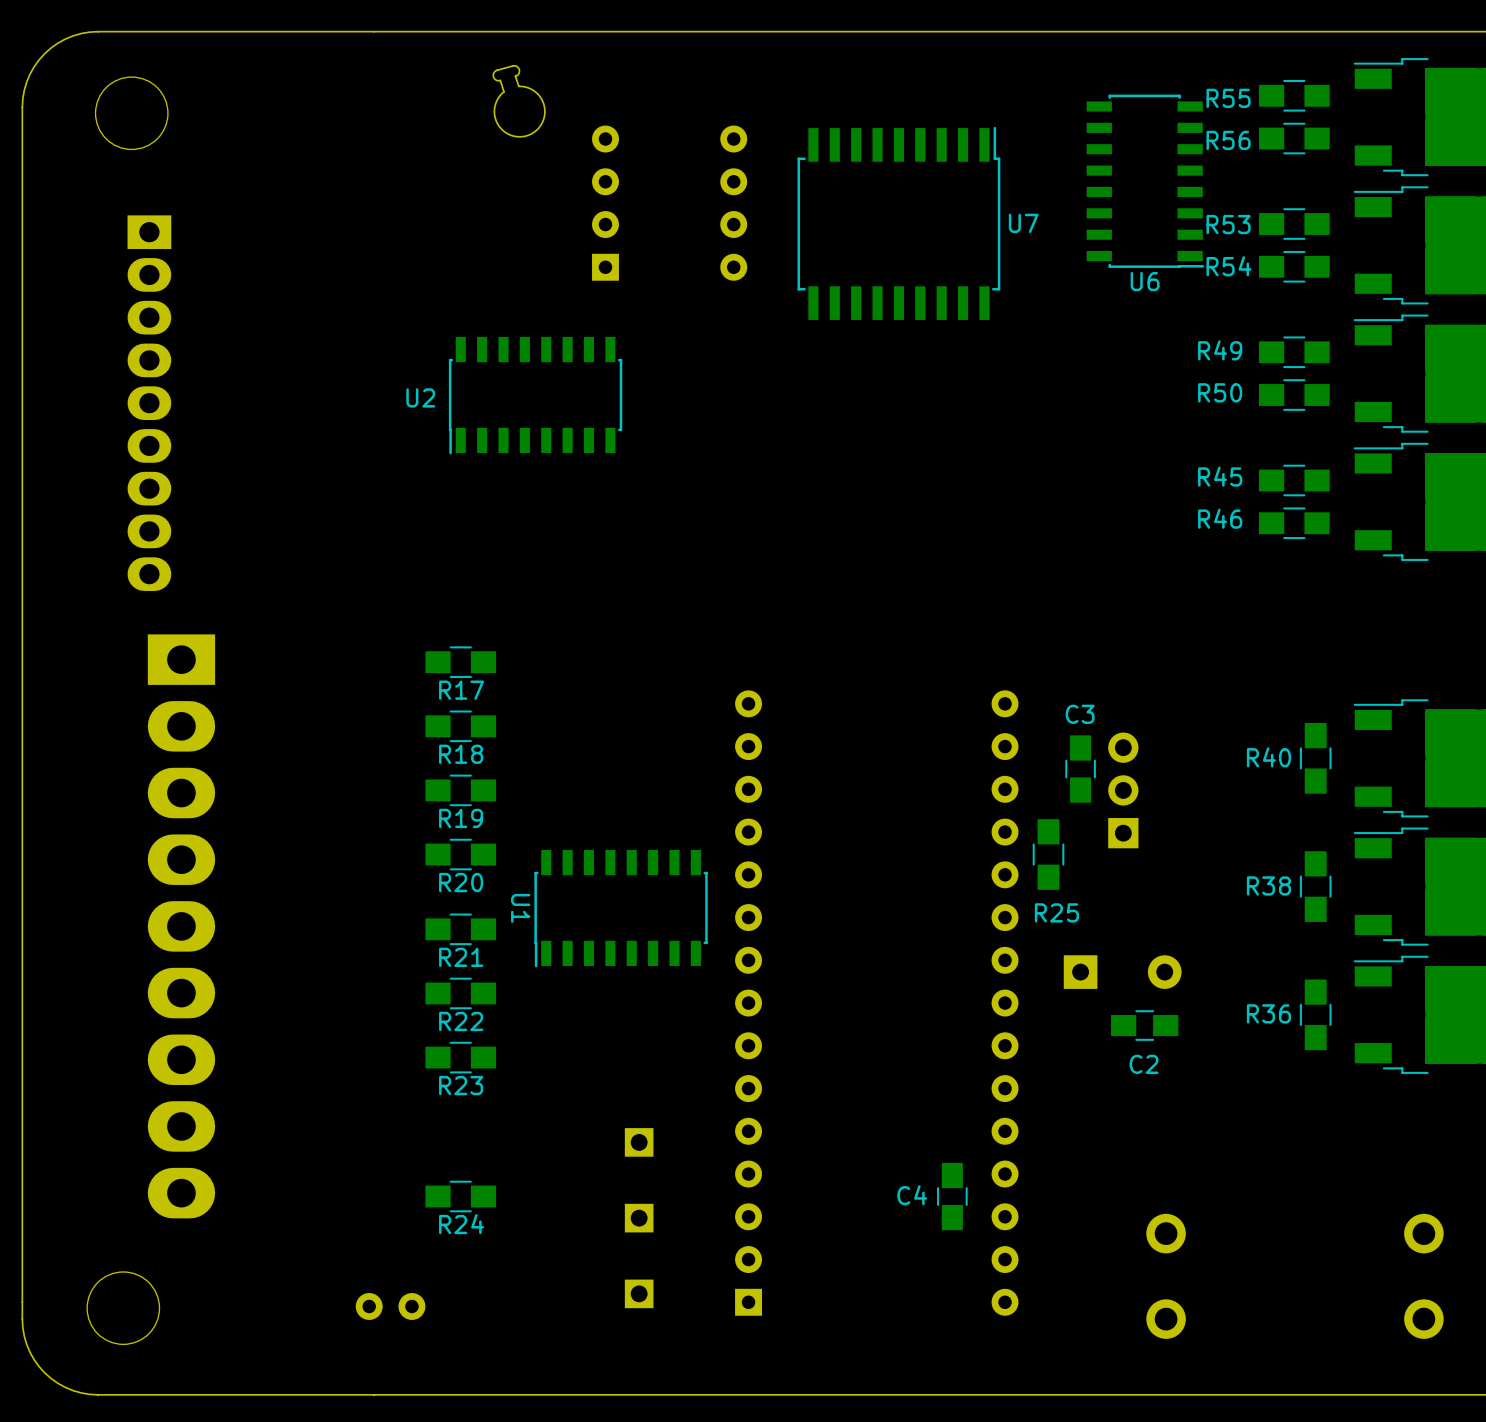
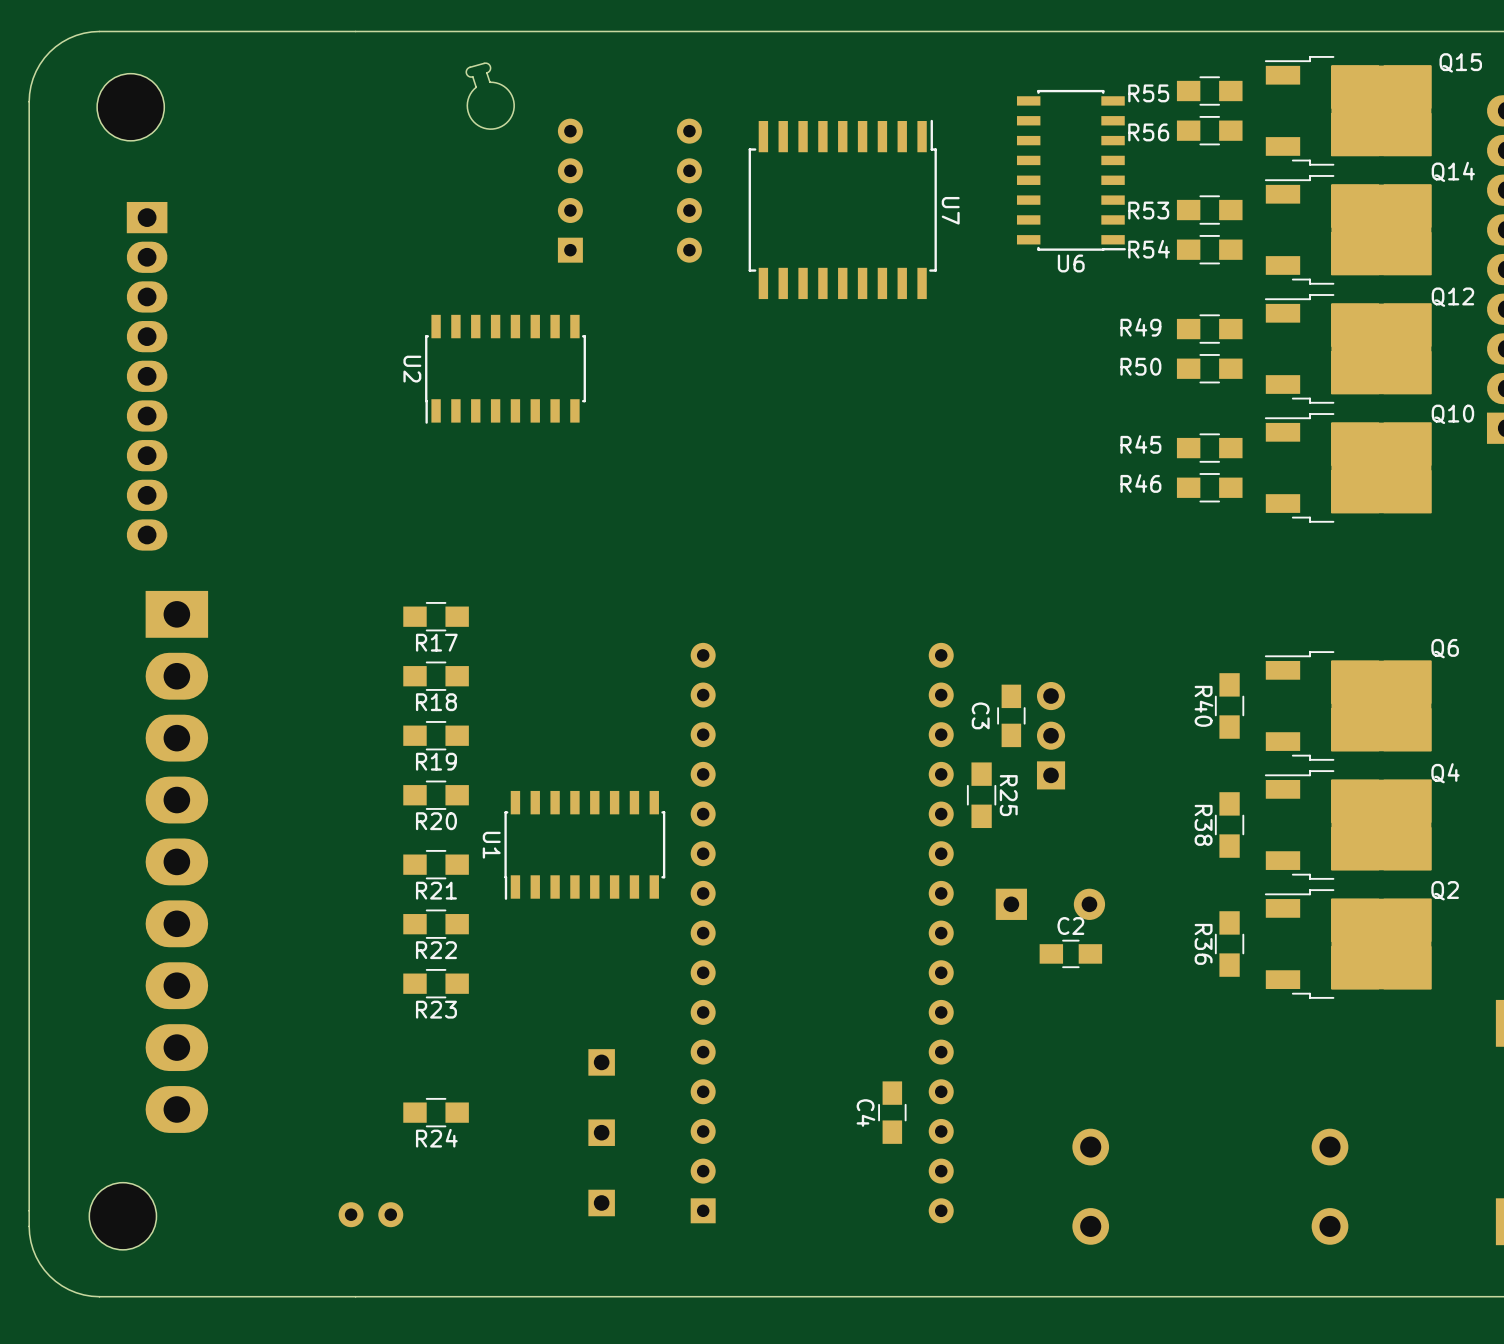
U7 name rotation: 0° (1023, 223) -> 90° clockwise (950, 210)
U2 name rotation: 0° (420, 397) -> 90° clockwise (412, 369)
C3 name rotation: 0° (1080, 714) -> 90° clockwise (980, 715)
C3 name position: C3 (1080, 714) -> C3 (980, 715)
R40 name rotation: 0° (1268, 757) -> 90° clockwise (1203, 706)
R38 name rotation: 0° (1268, 885) -> 90° clockwise (1203, 825)
R25 name rotation: 0° (1056, 912) -> 90° clockwise (1008, 795)
R25 name position: R25 (1056, 912) -> R25 (1008, 795)
R36 name rotation: 0° (1268, 1013) -> 90° clockwise (1203, 944)
C2 name position: C2 (1144, 1064) -> C2 (1070, 926)
C4 name rotation: 0° (912, 1195) -> 90° clockwise (865, 1112)

